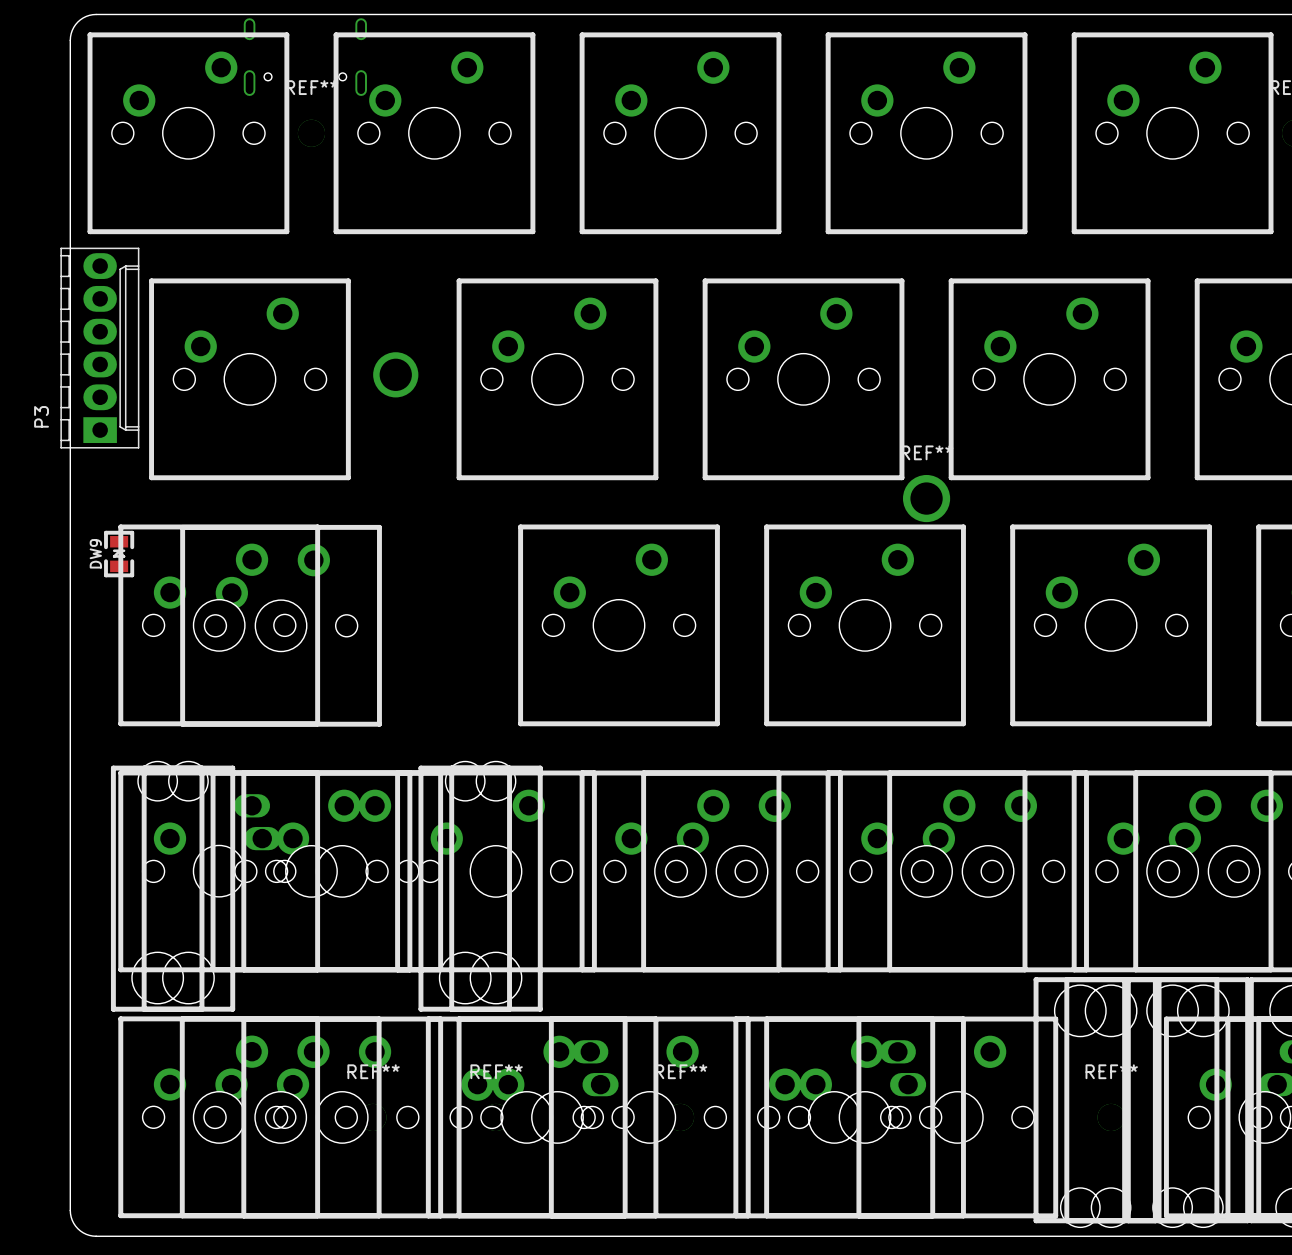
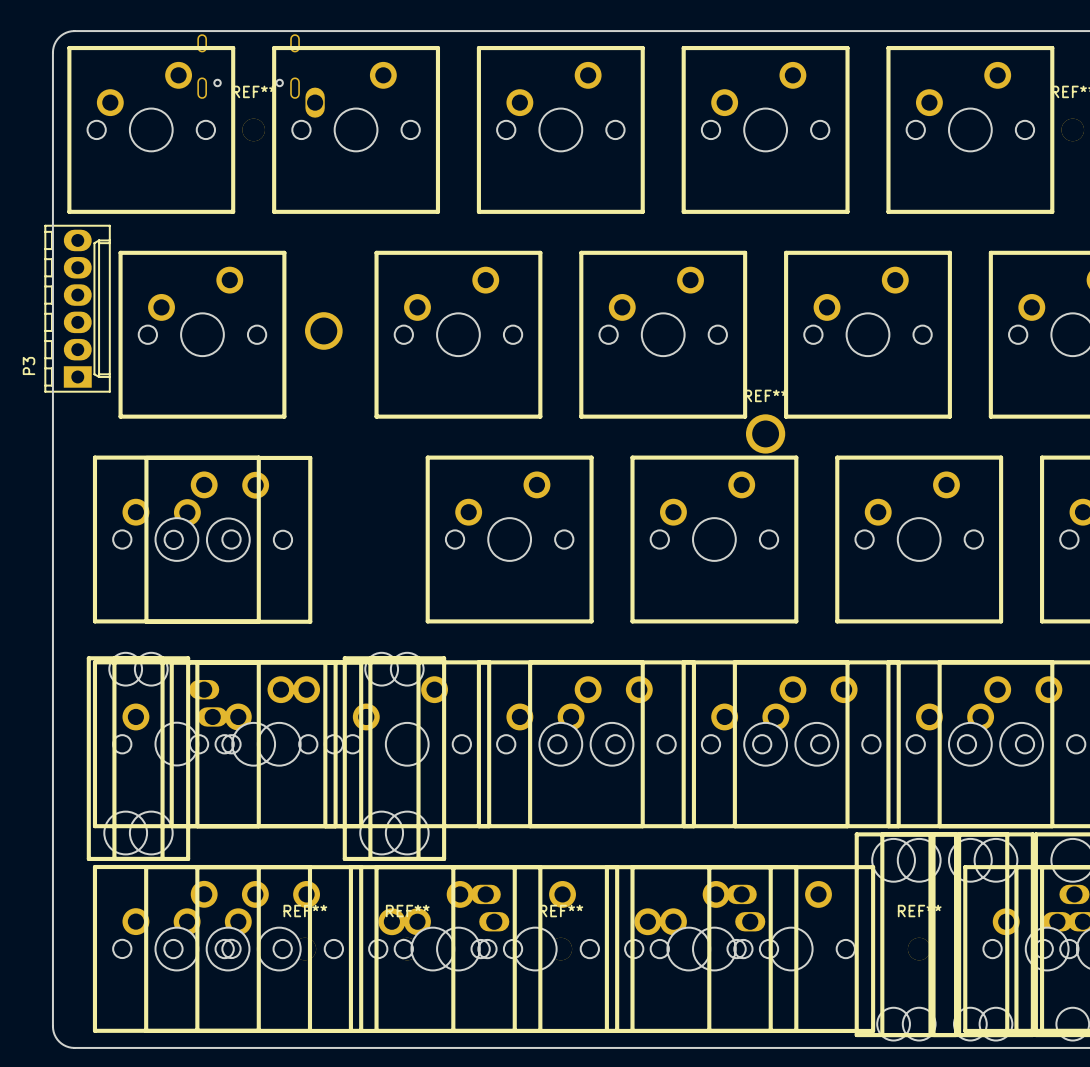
part footprint: [333, 32, 536, 235] -> [272, 45, 441, 214]
DW9: (119, 554) -> none

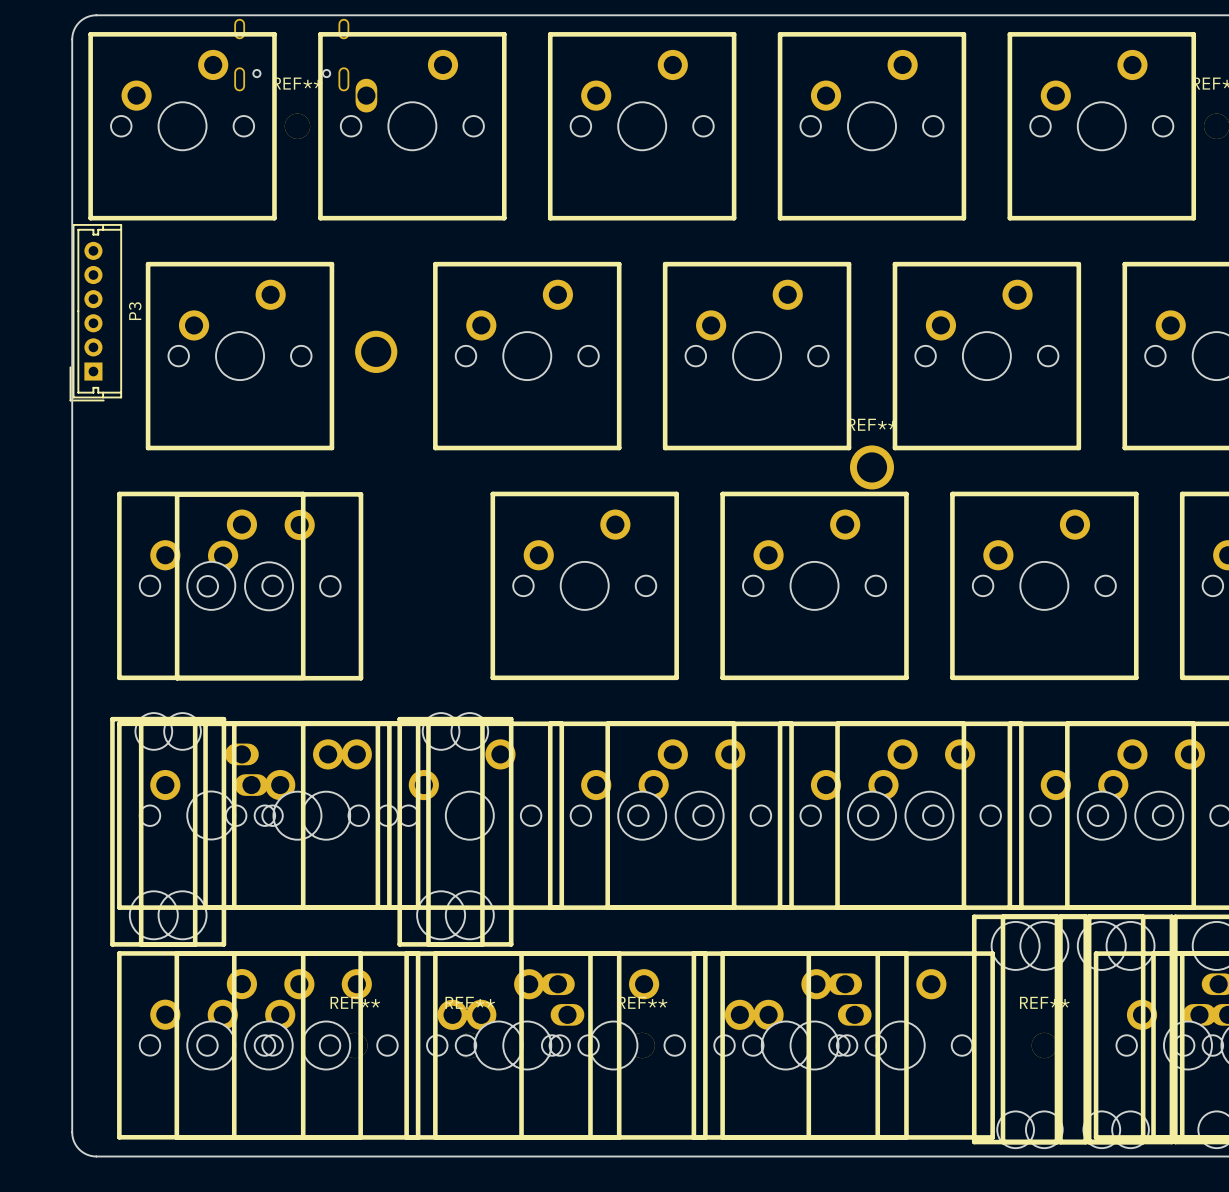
P3 footprint: [44, 225, 111, 393] -> [69, 224, 122, 402]
P3 name position: P3 (29, 365) -> P3 (135, 311)

